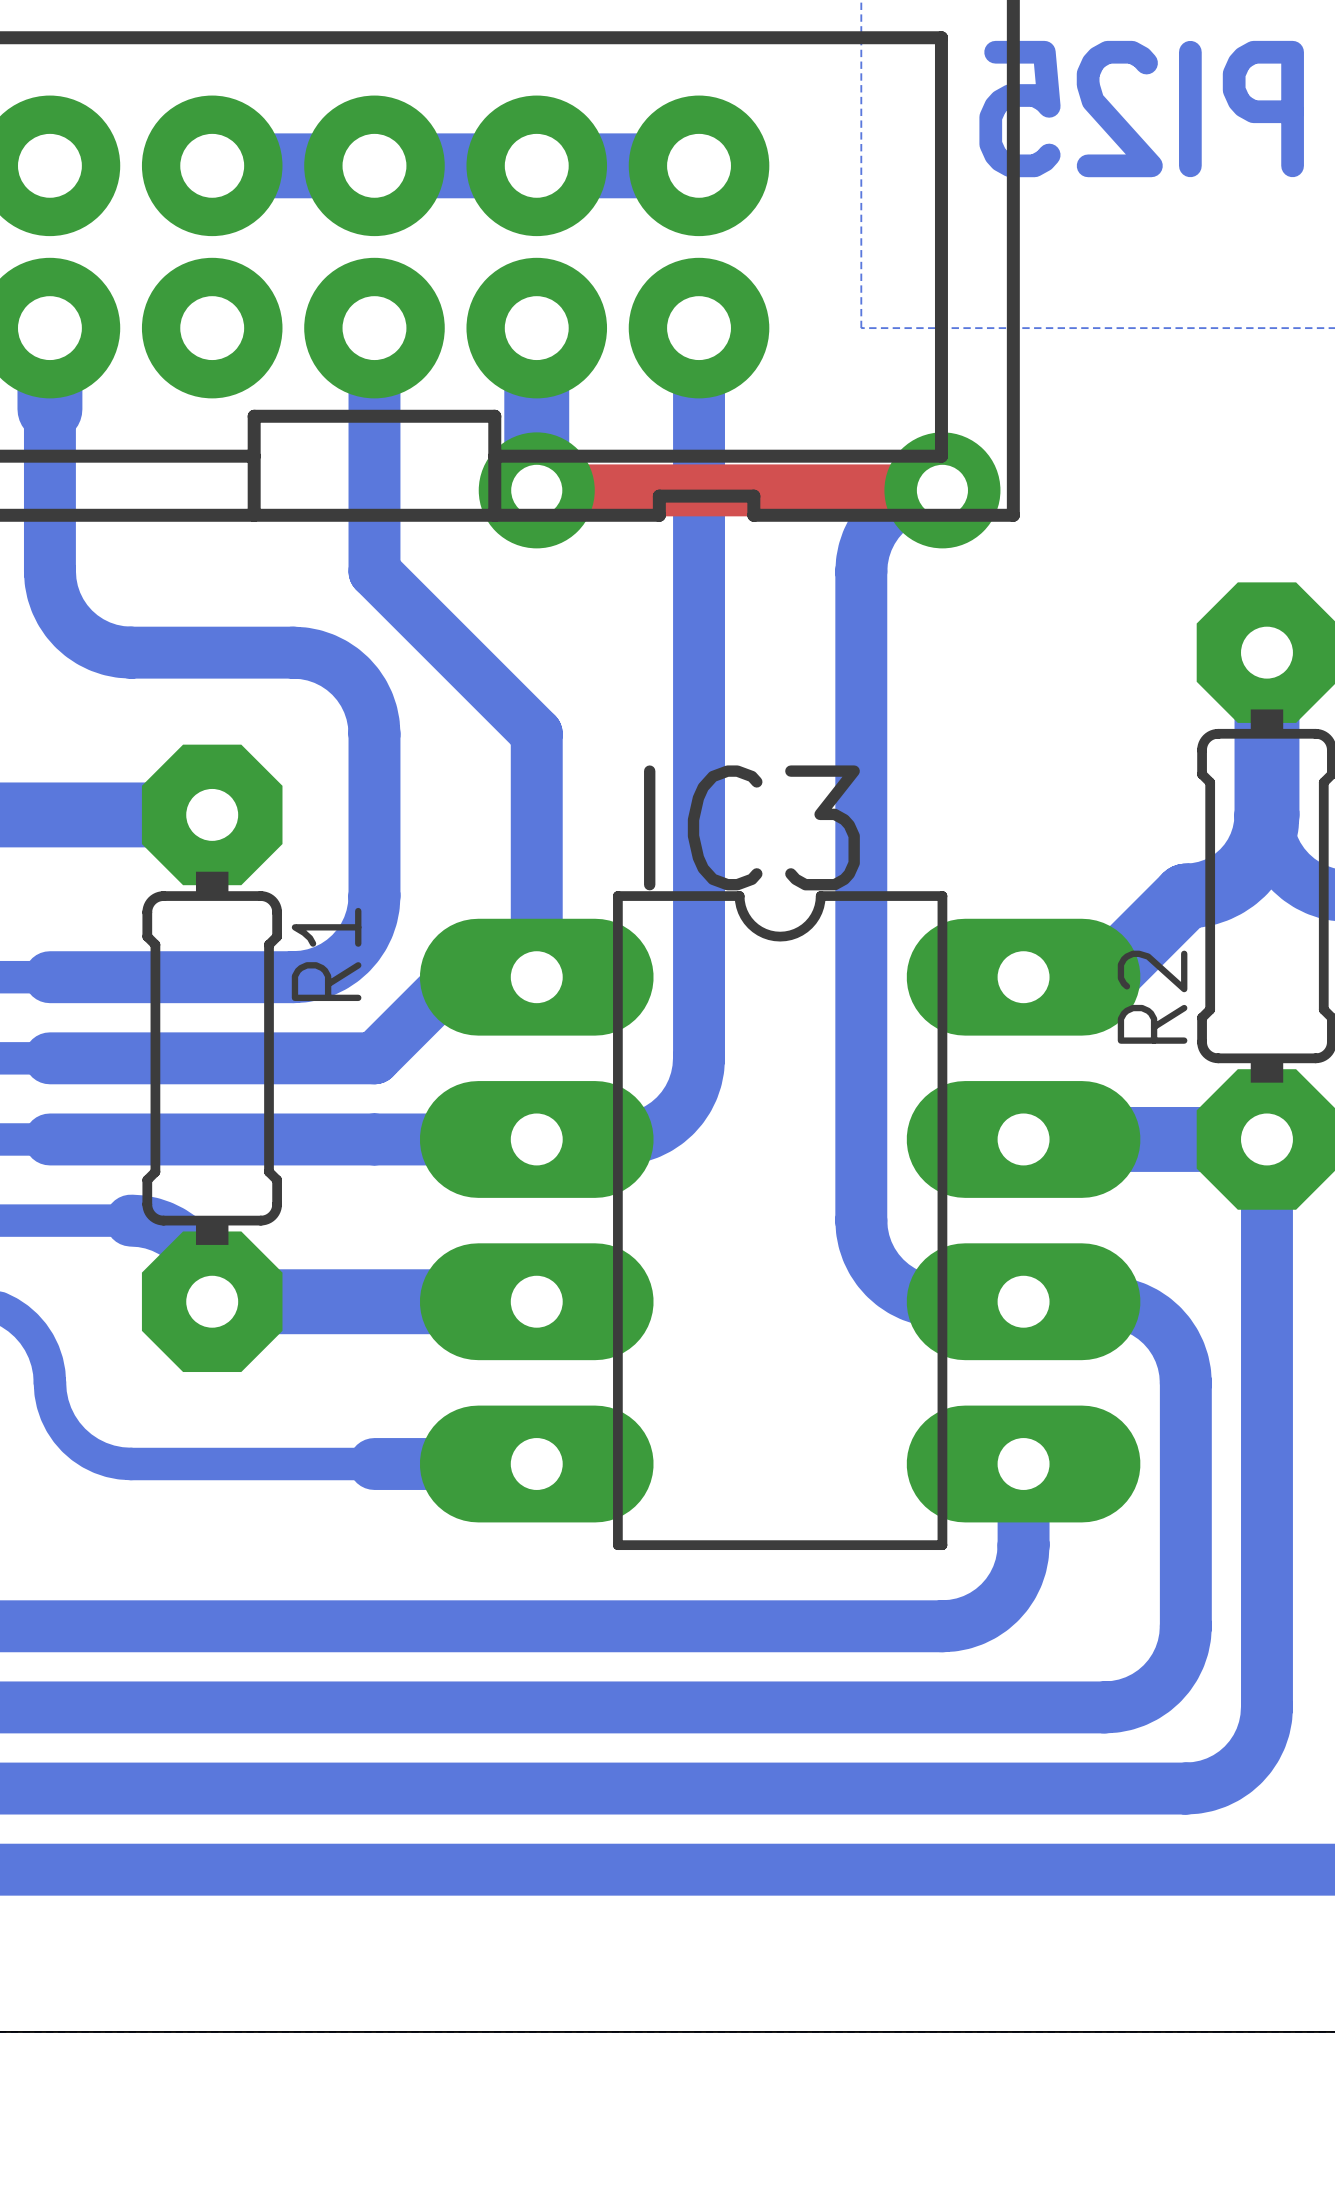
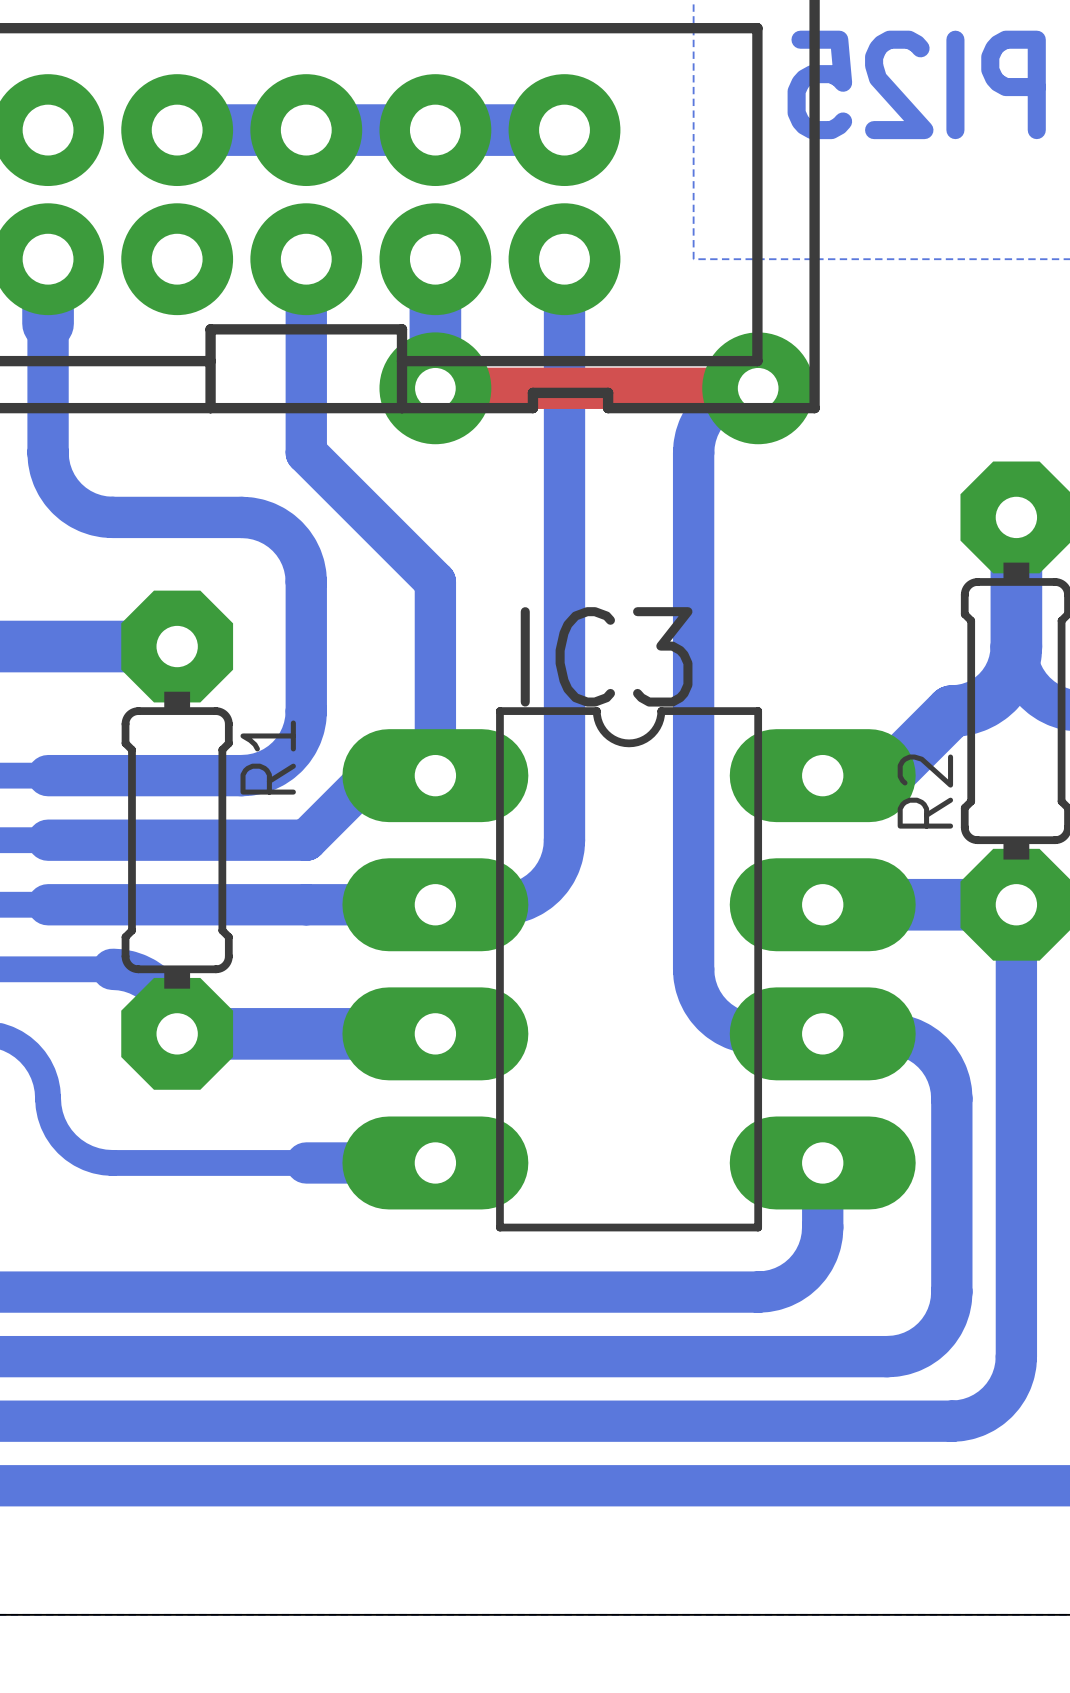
via size: [478, 432, 595, 549] -> [379, 332, 492, 445]
via size: [884, 432, 1001, 549] -> [702, 332, 815, 445]

